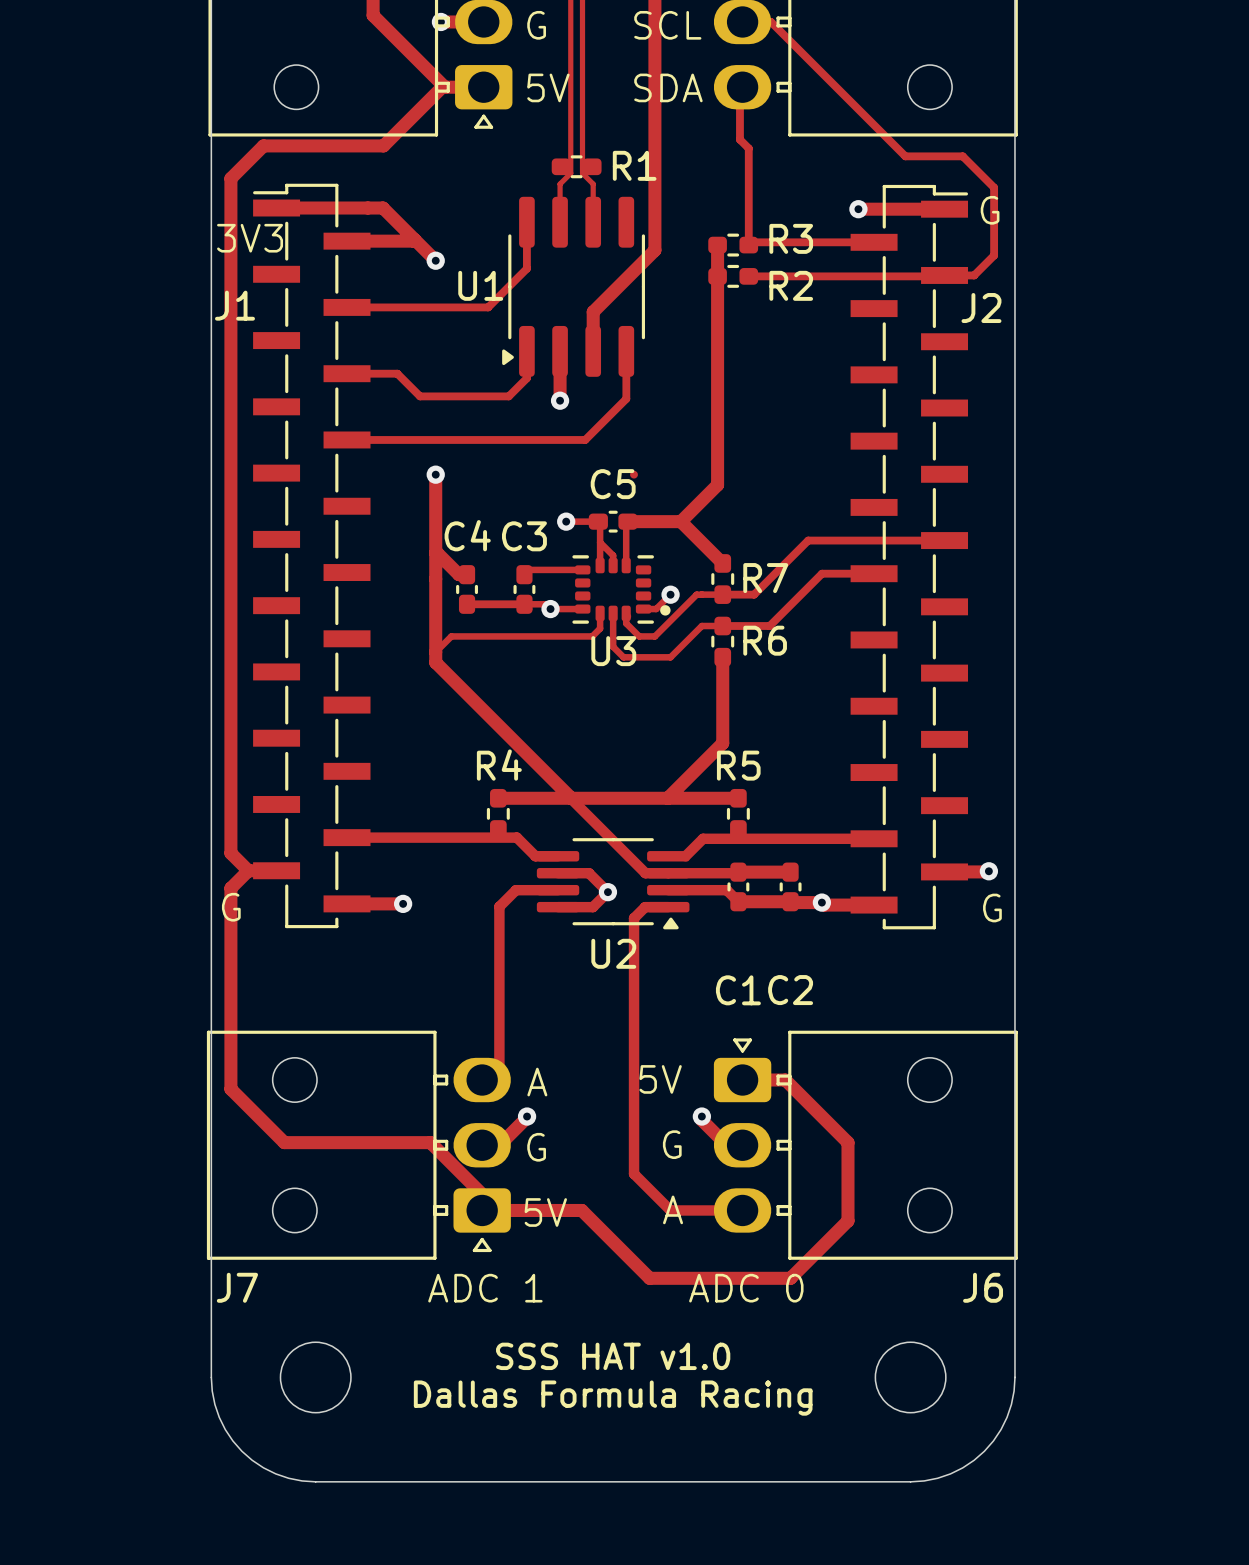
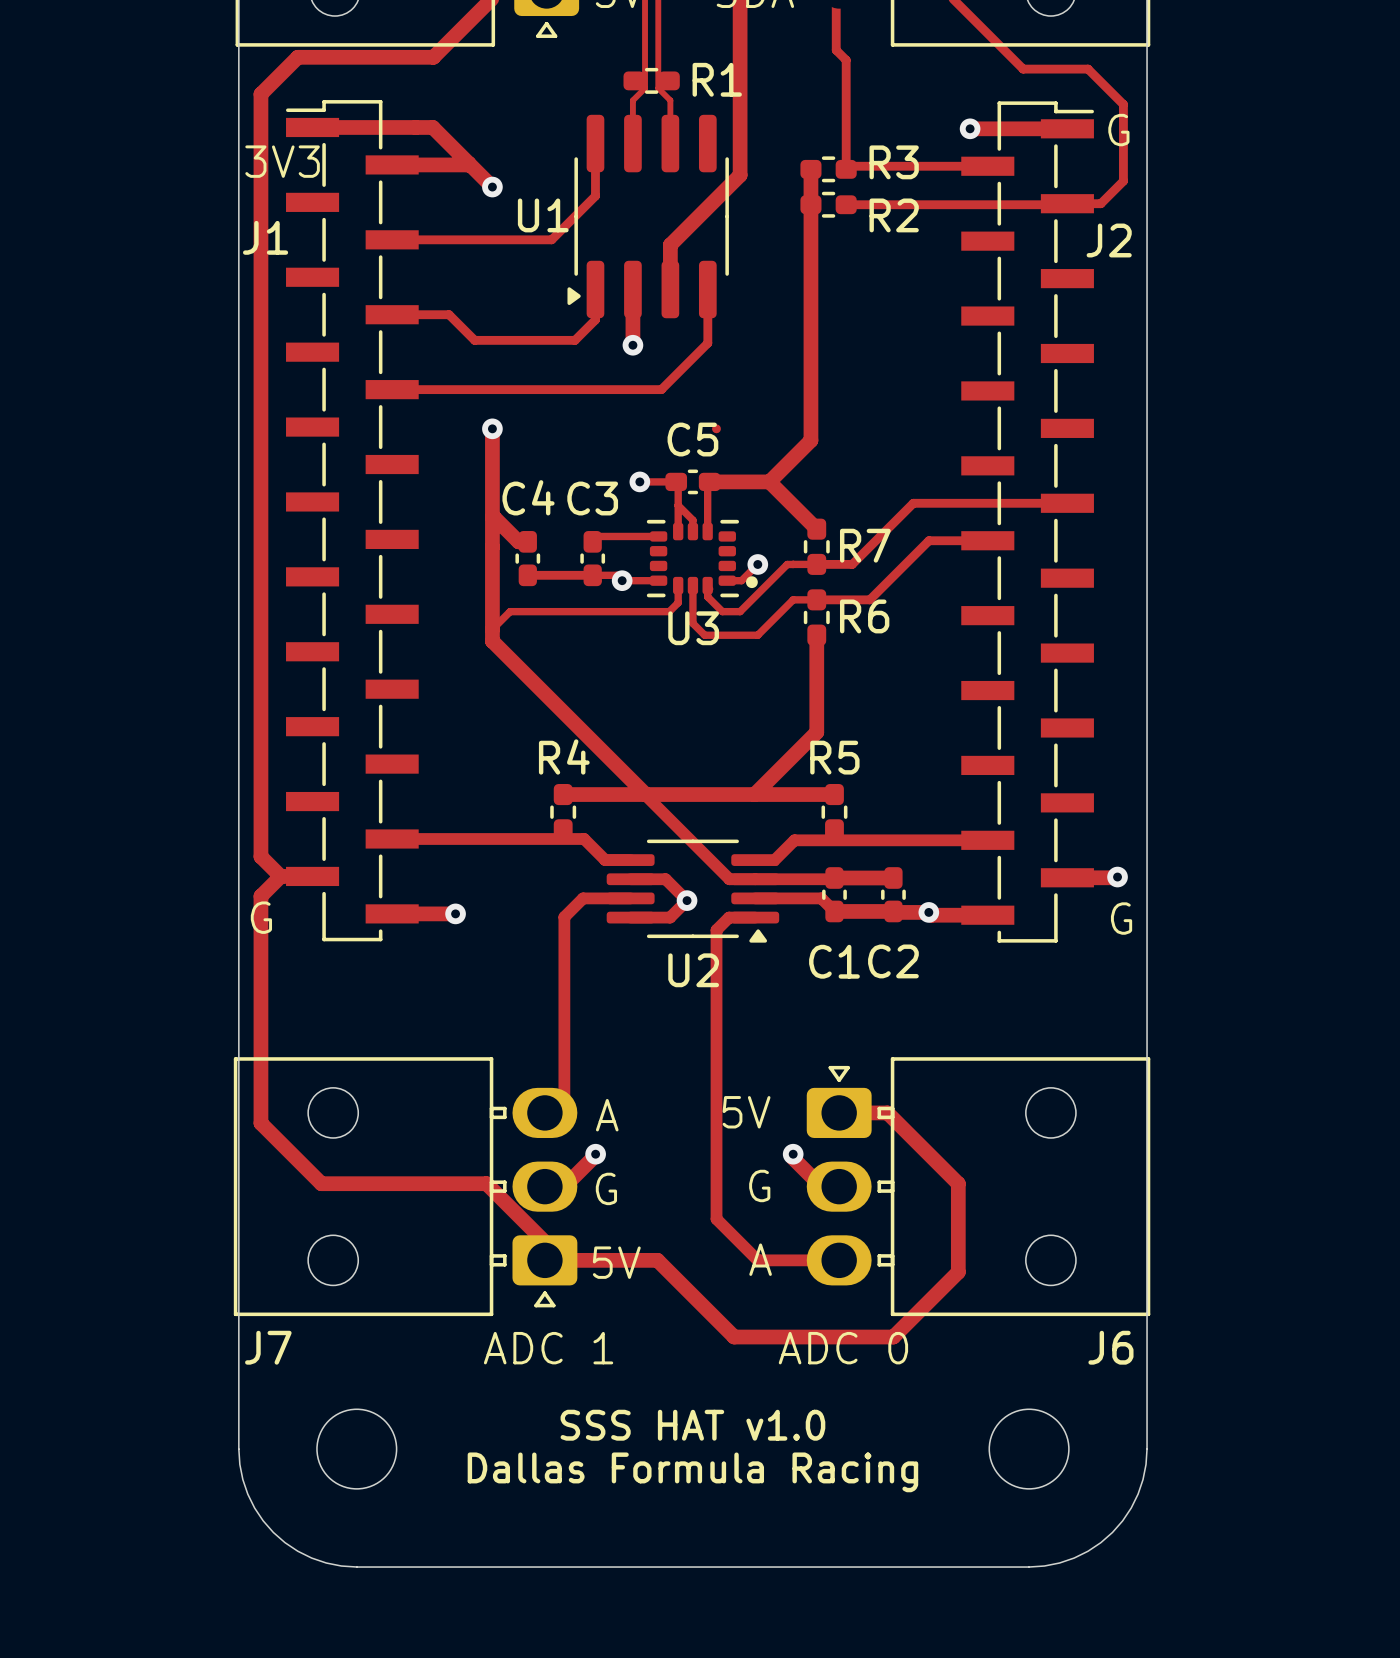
C1 name position: C1 (738, 990) -> C1 (834, 961)
C2 name position: C2 (790, 990) -> C2 (893, 961)

